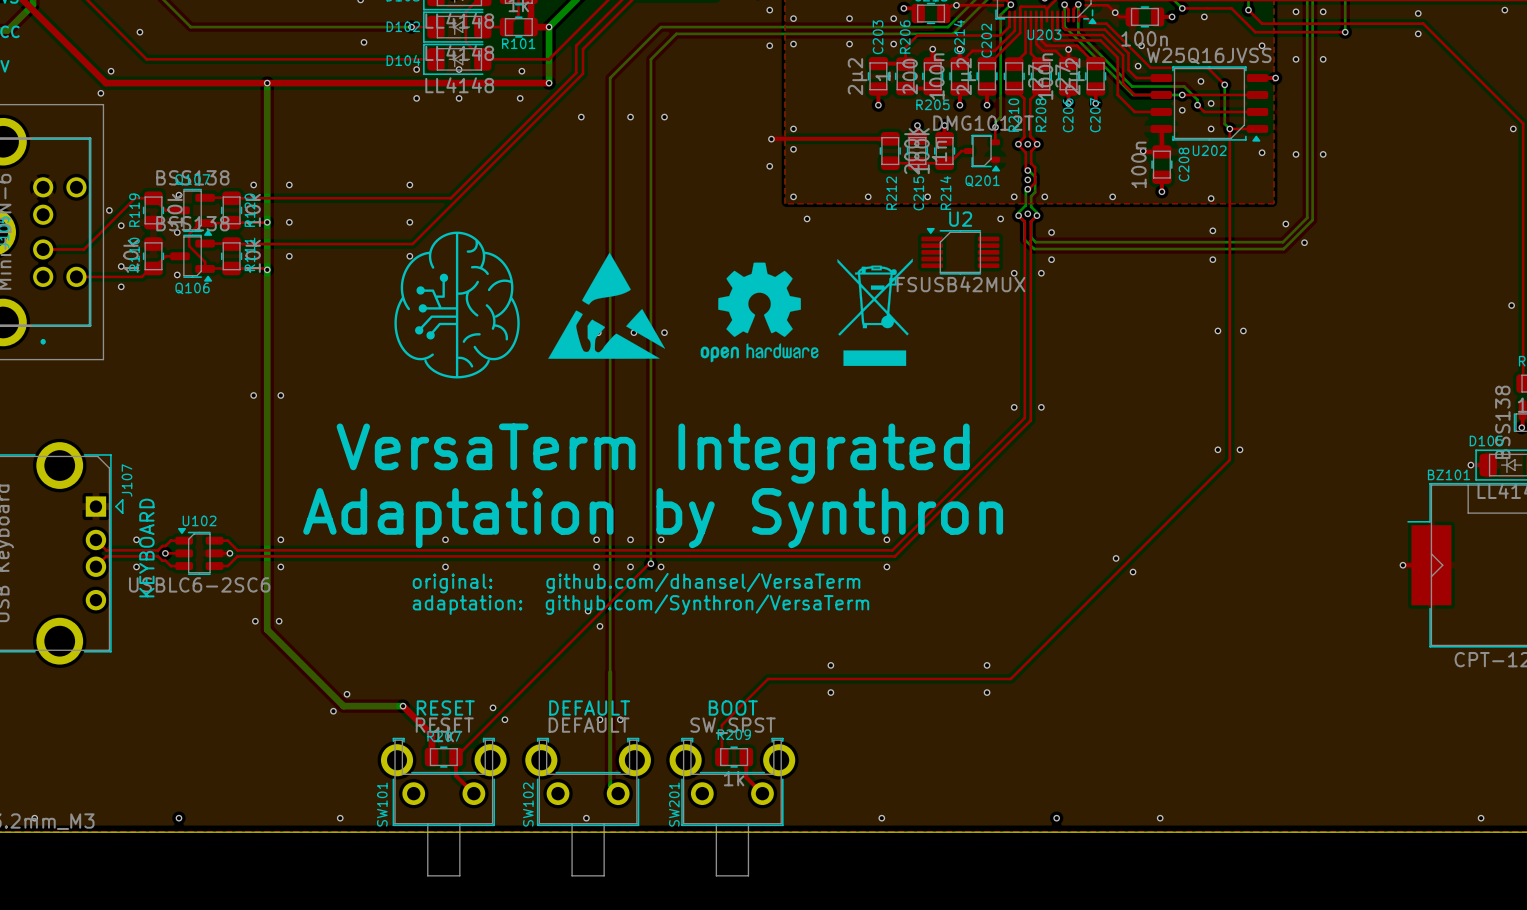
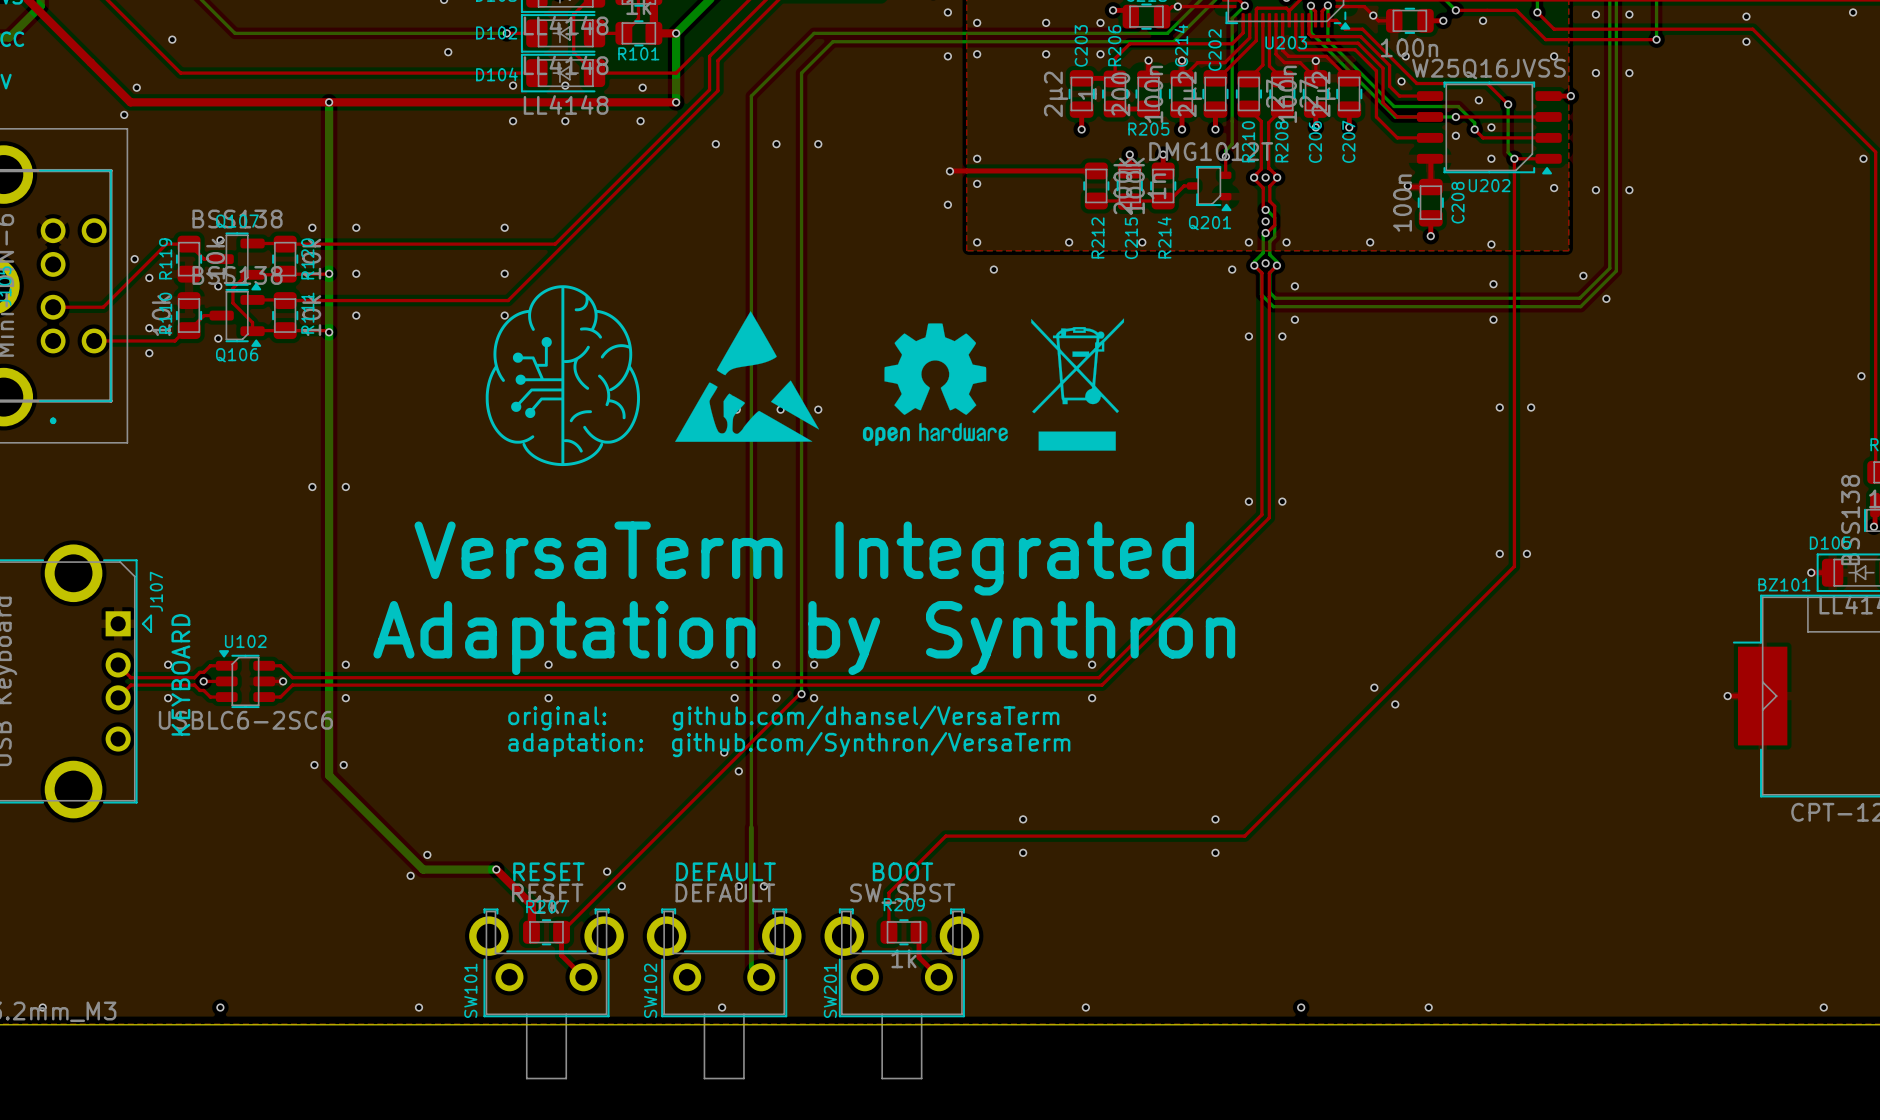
U2: FSUSB42MUX (960, 251) -> none

